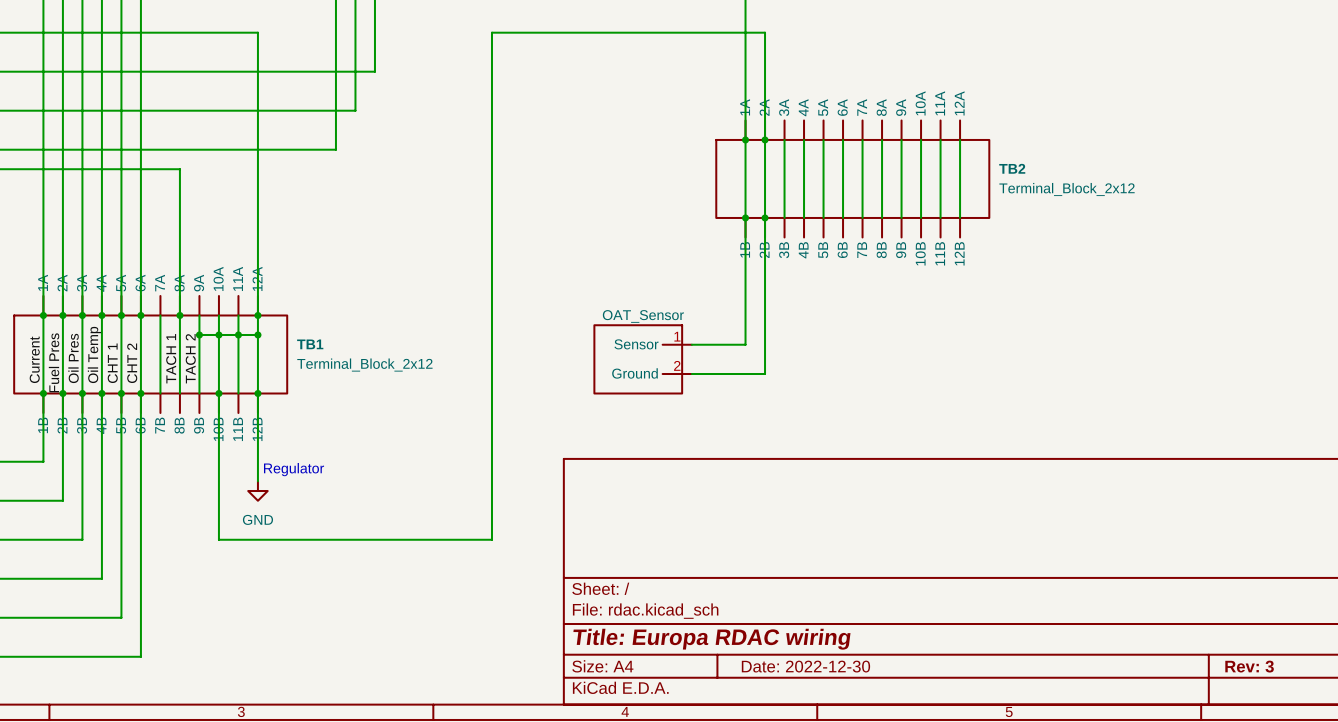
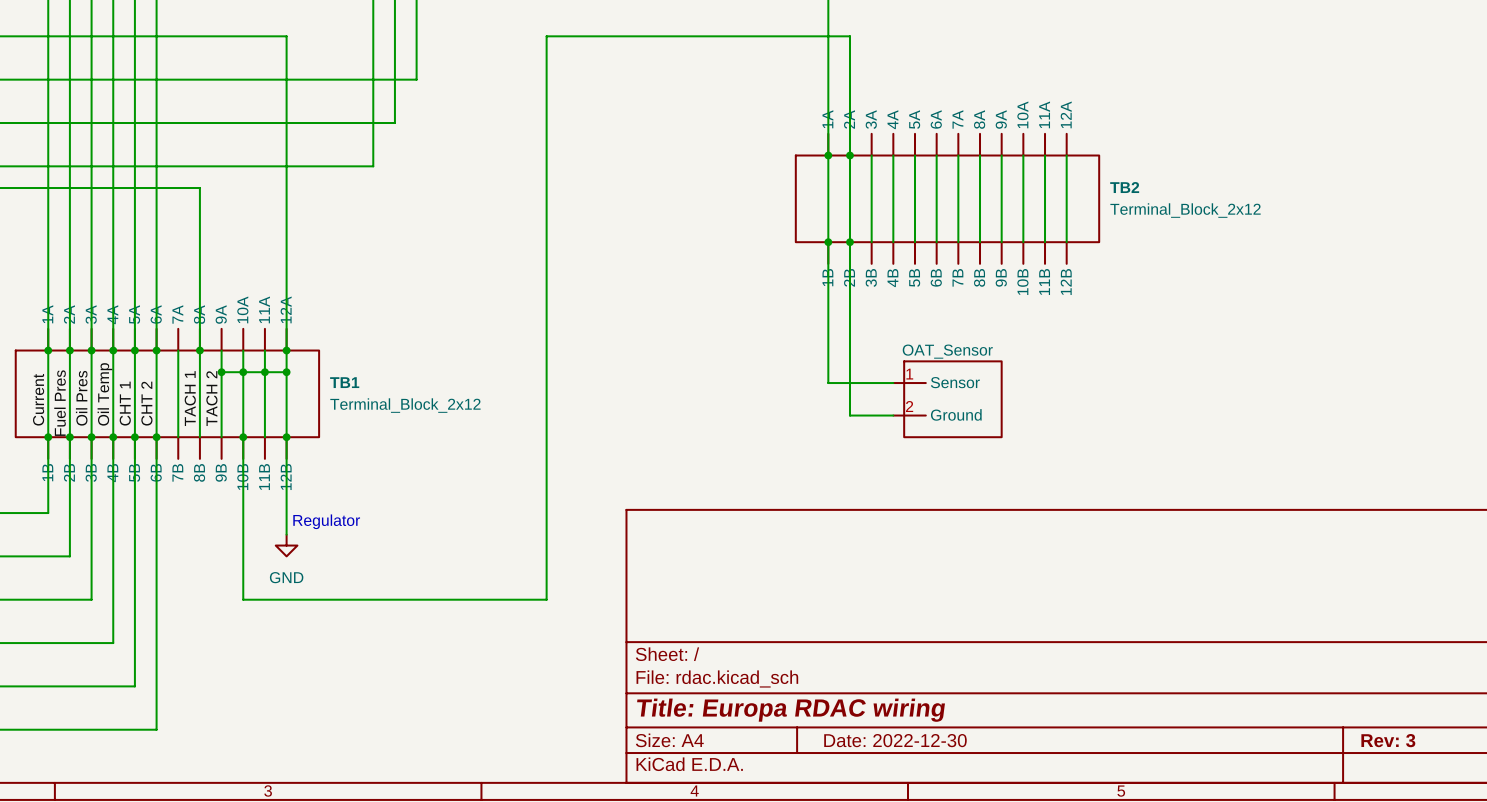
wire: (691, 344) (745, 344) -> (893, 383) (828, 383)
part: OAT_Sensor (643, 359) -> none
part: none -> OAT_Sensor (947, 399)
wire: (691, 373) (765, 373) -> (893, 415) (849, 415)

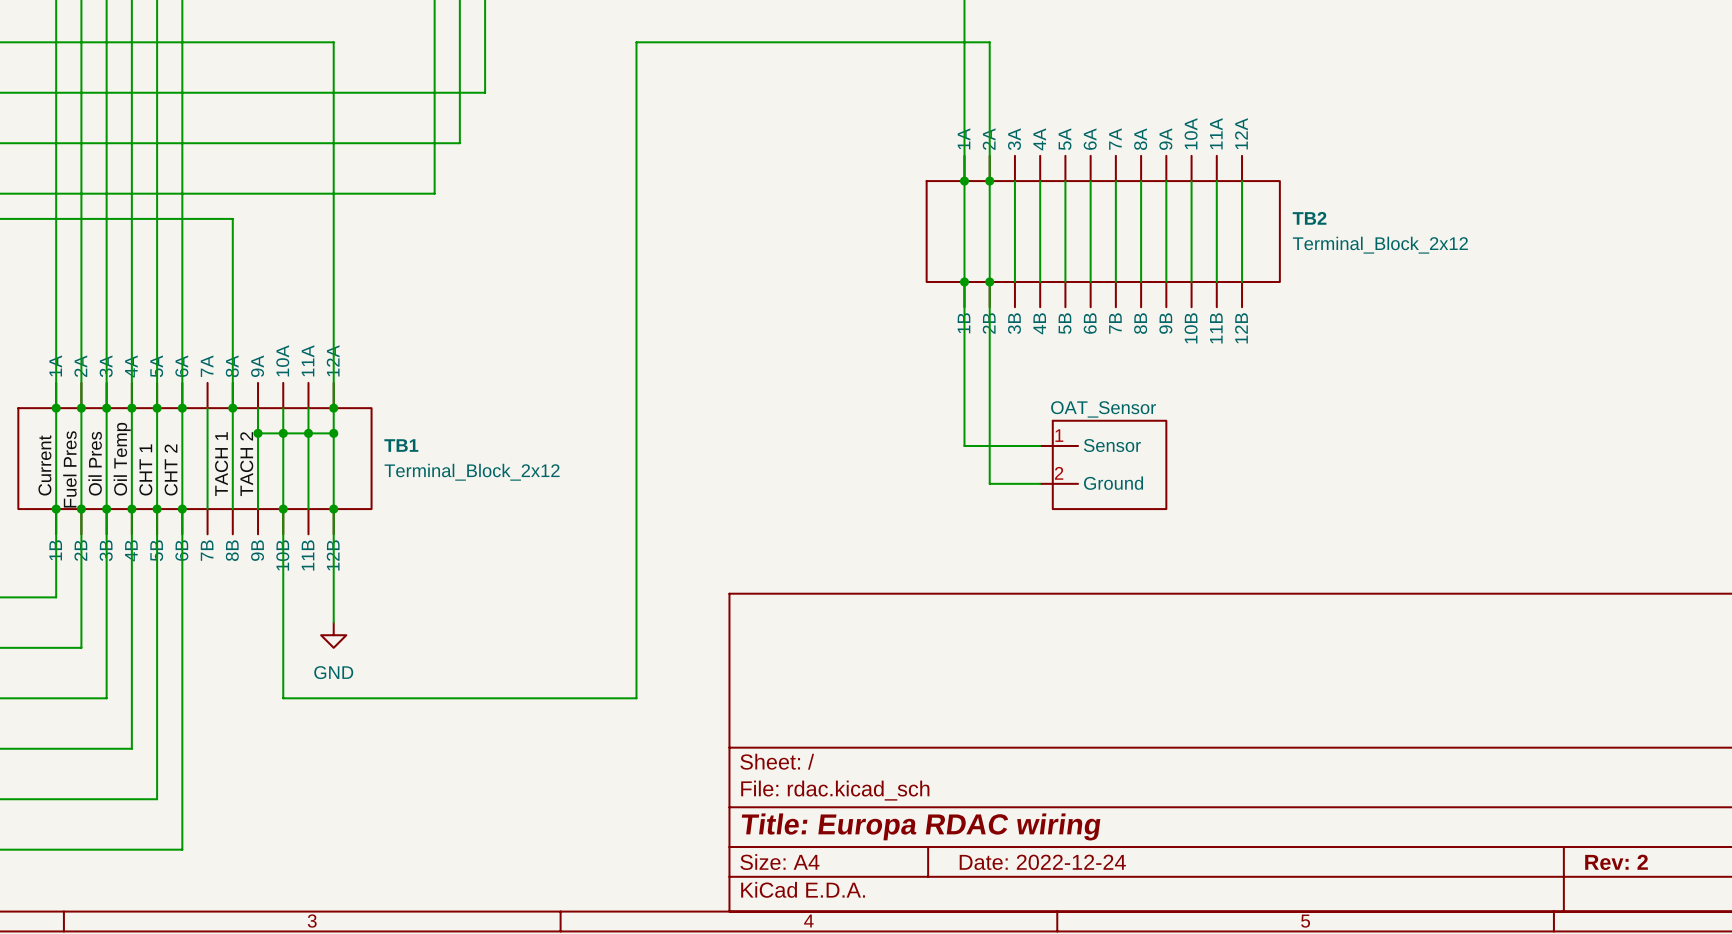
text: Regulator (326, 521) -> none
title block: Date: 2022-12-30 (895, 740) -> Date: 2022-12-24 (1042, 862)
title block: Rev: 3 (1388, 740) -> Rev: 2 (1616, 862)

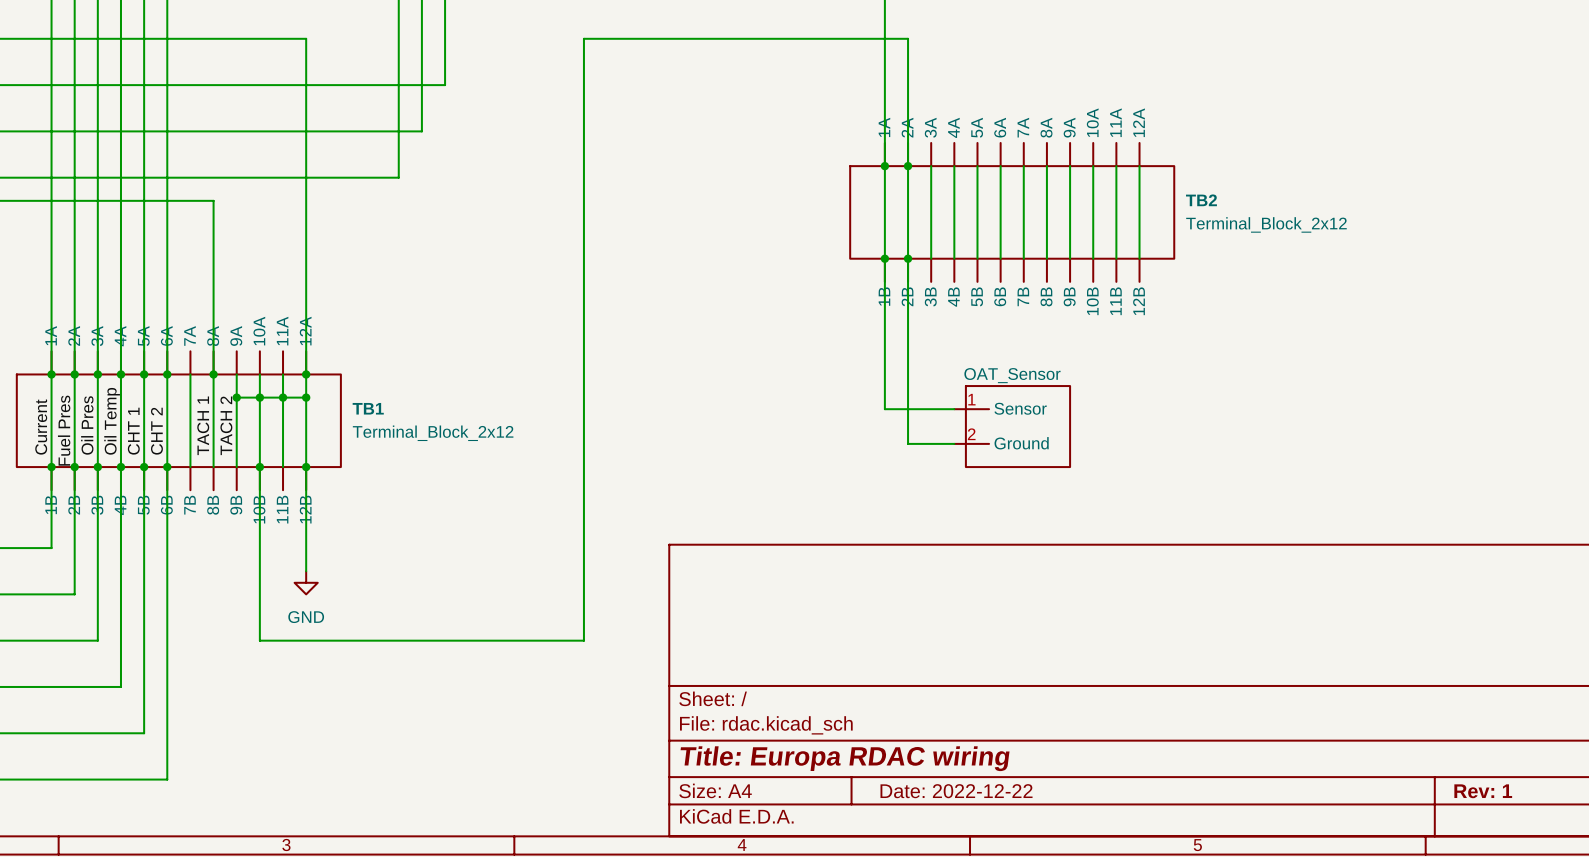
title block: Date: 2022-12-24 (1042, 862) -> Date: 2022-12-22 (956, 791)
title block: Rev: 2 (1616, 862) -> Rev: 1 (1483, 791)

